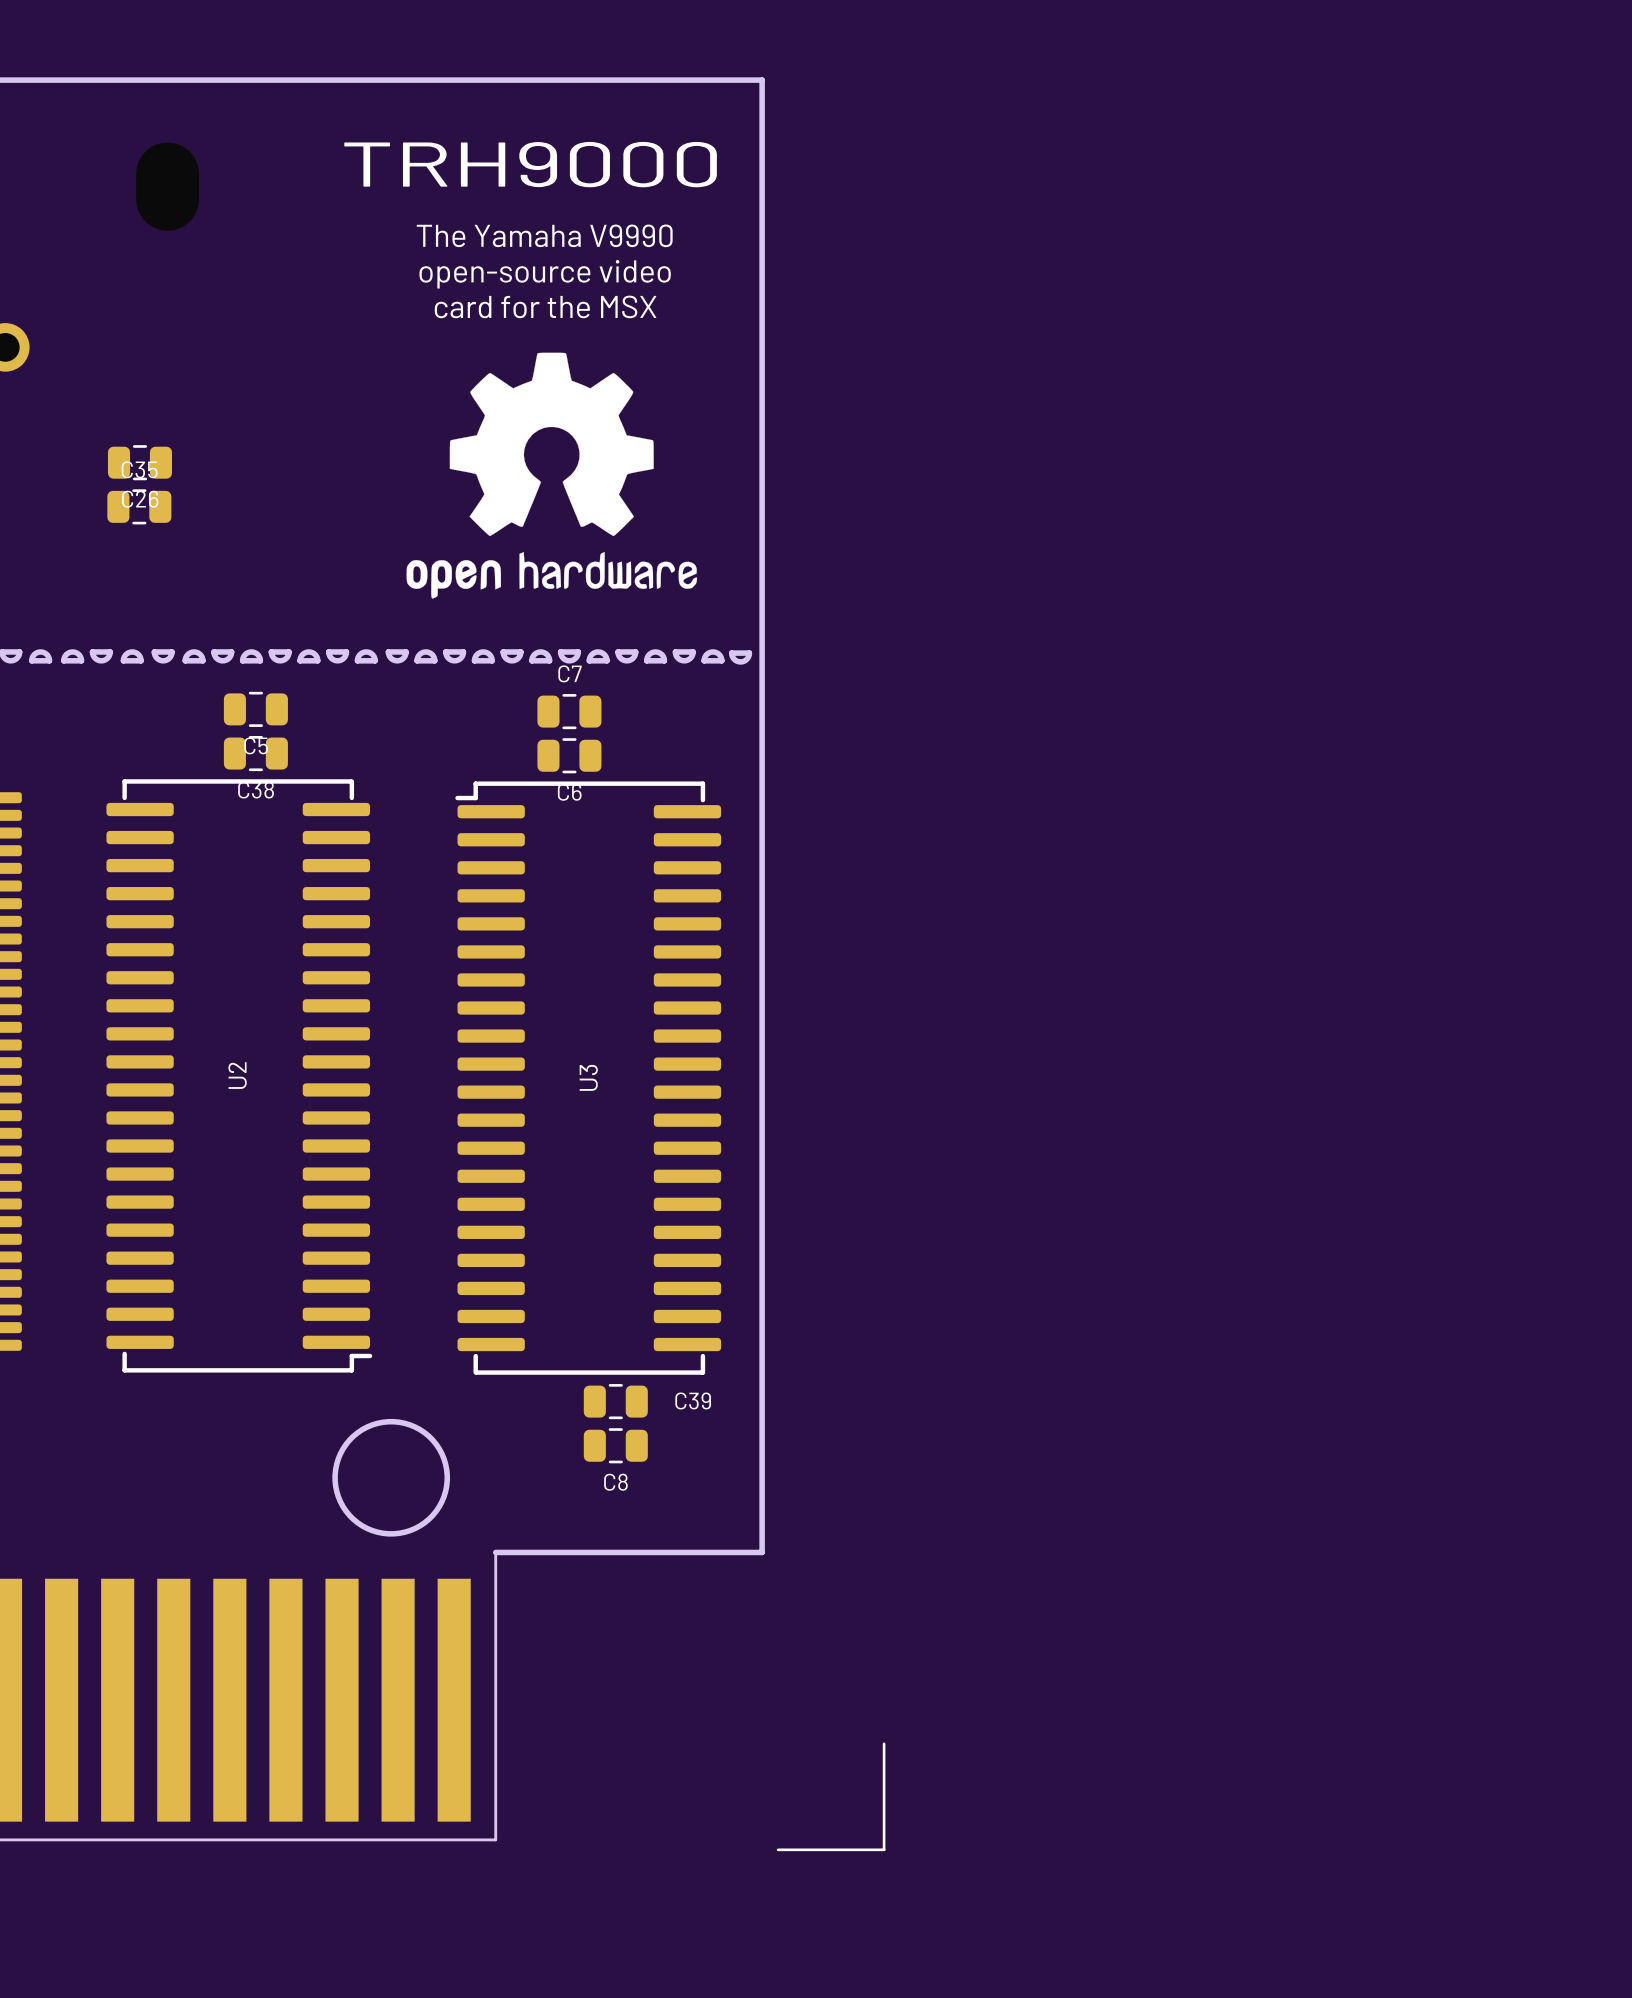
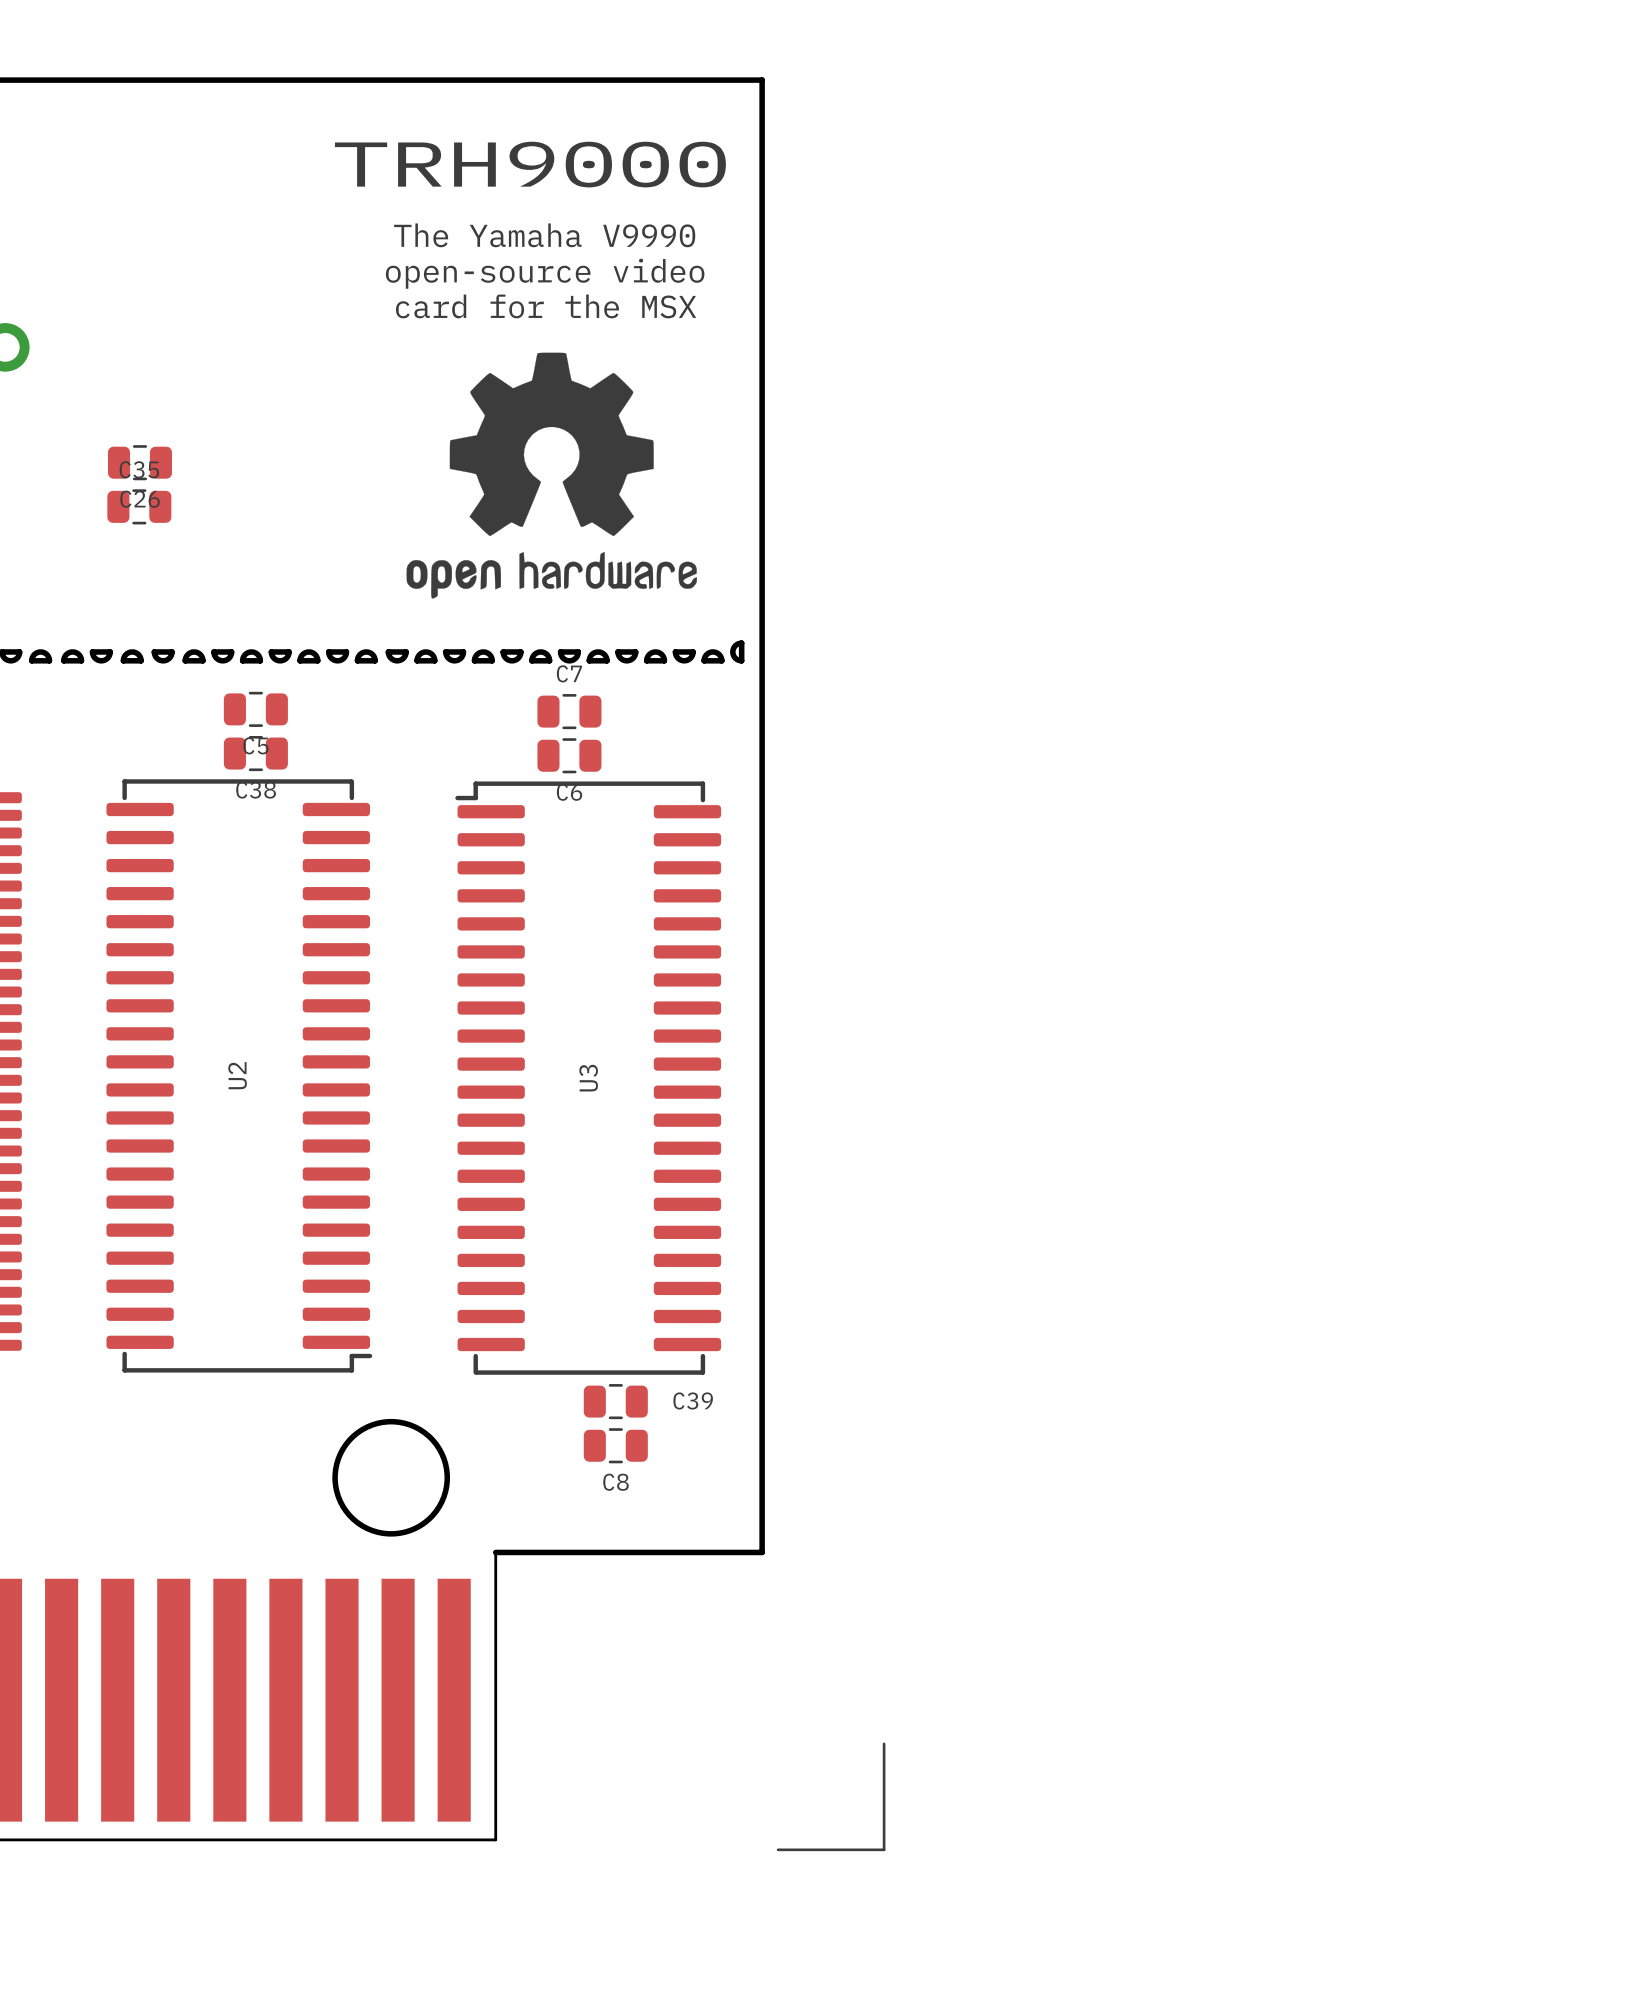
board edge: none -> (741, 643) (741, 660) (735, 658) (732, 651) (735, 646) (741, 643)
board edge: (731, 653) (749, 653) (746, 659) (740, 661) (734, 659) (731, 653) -> none

